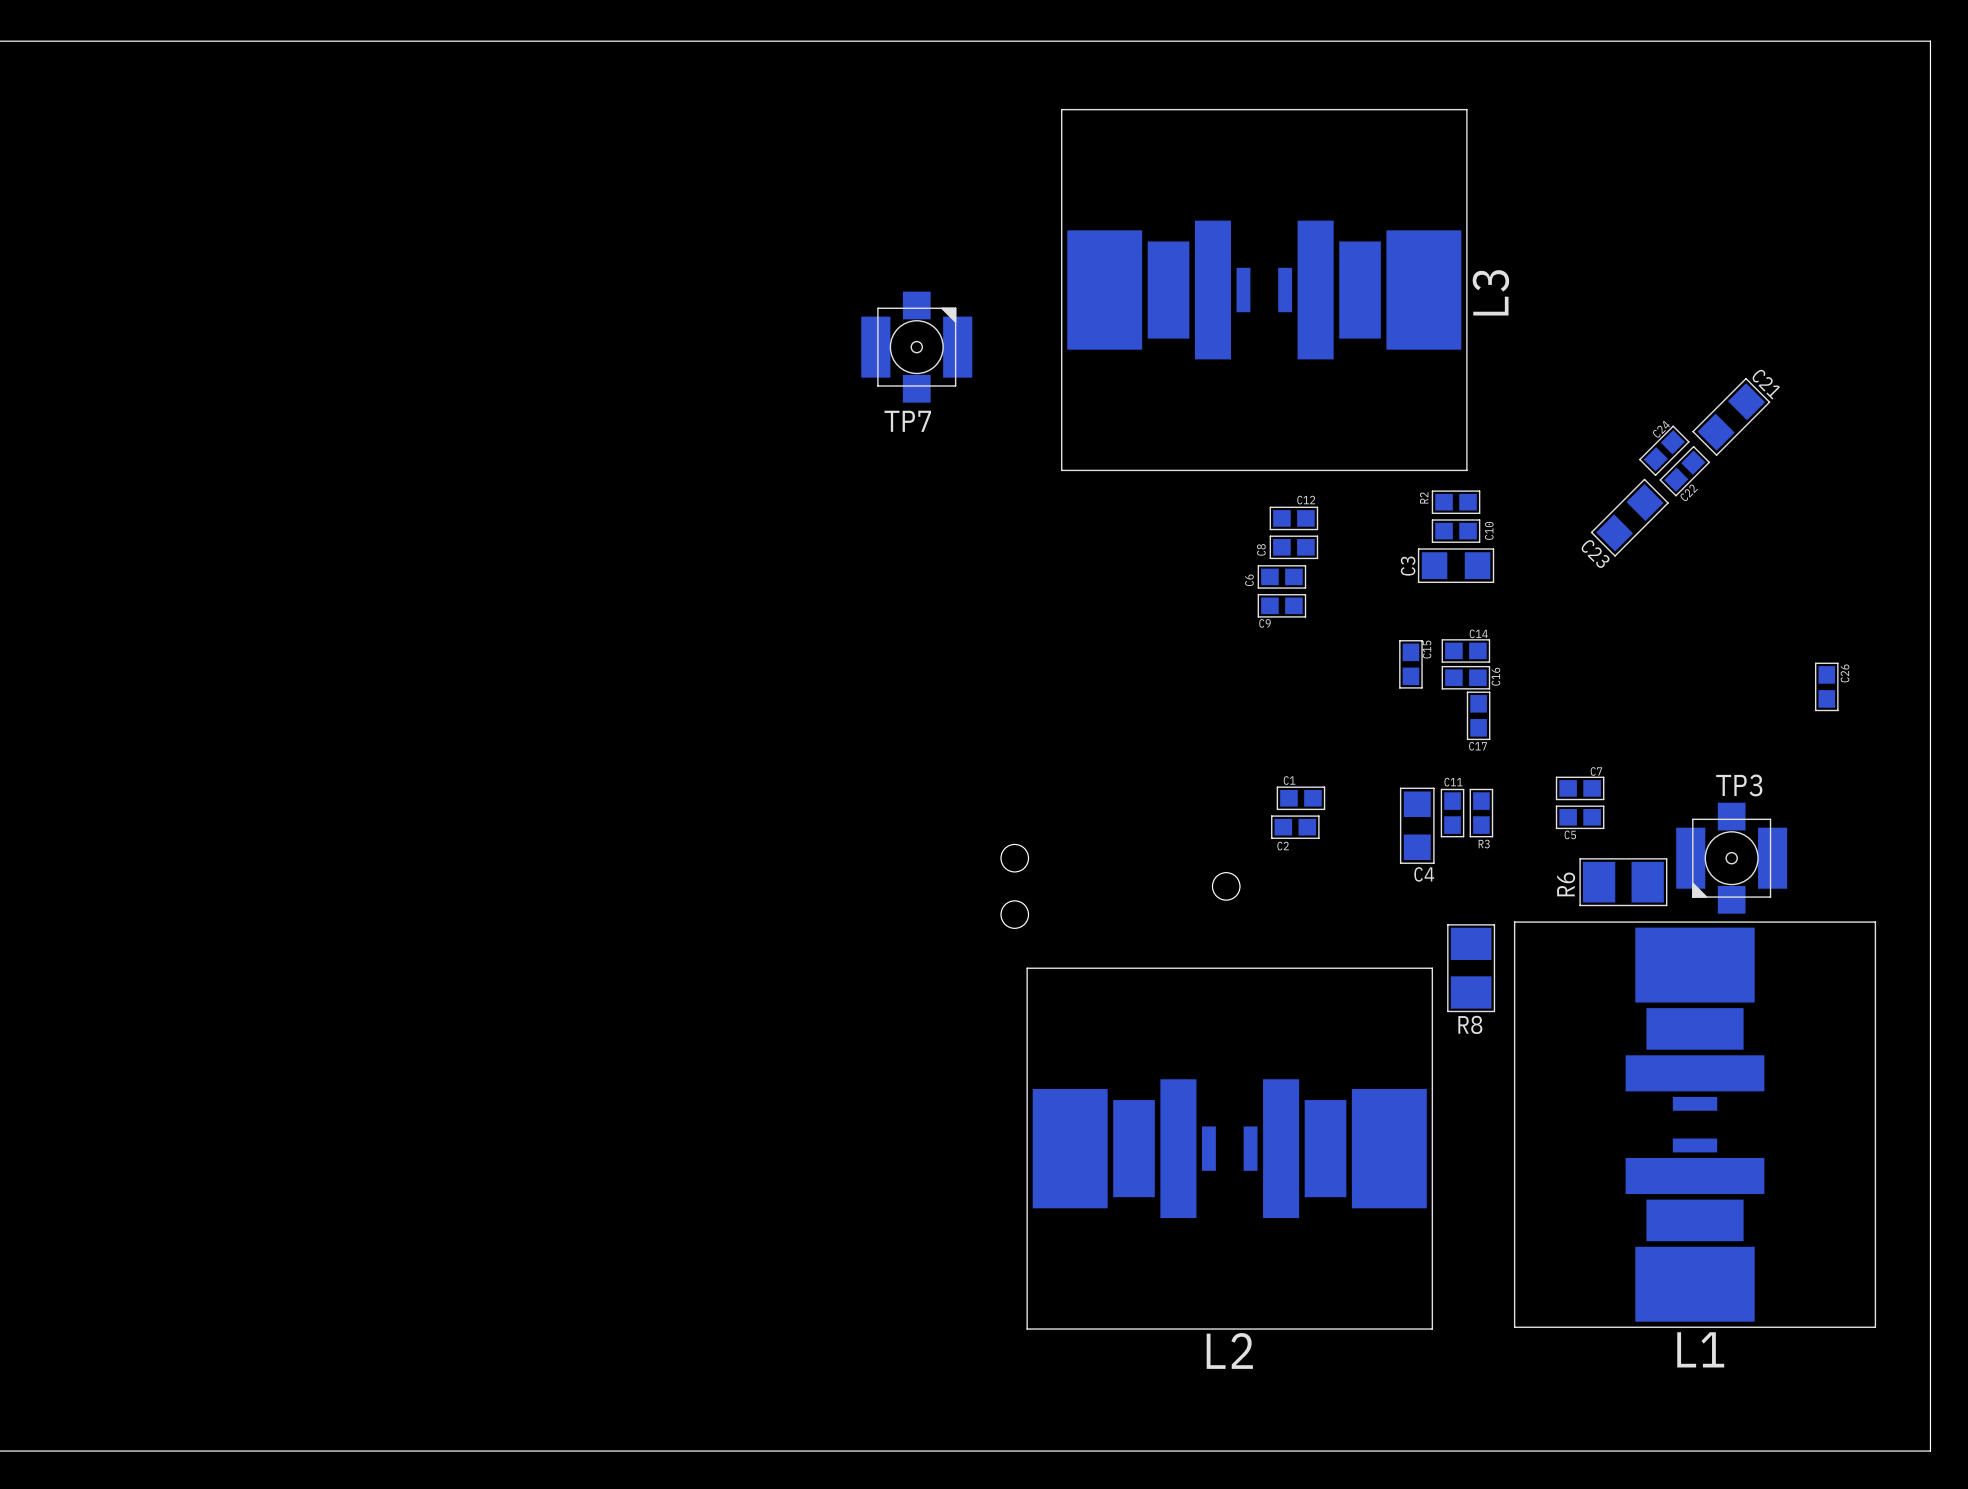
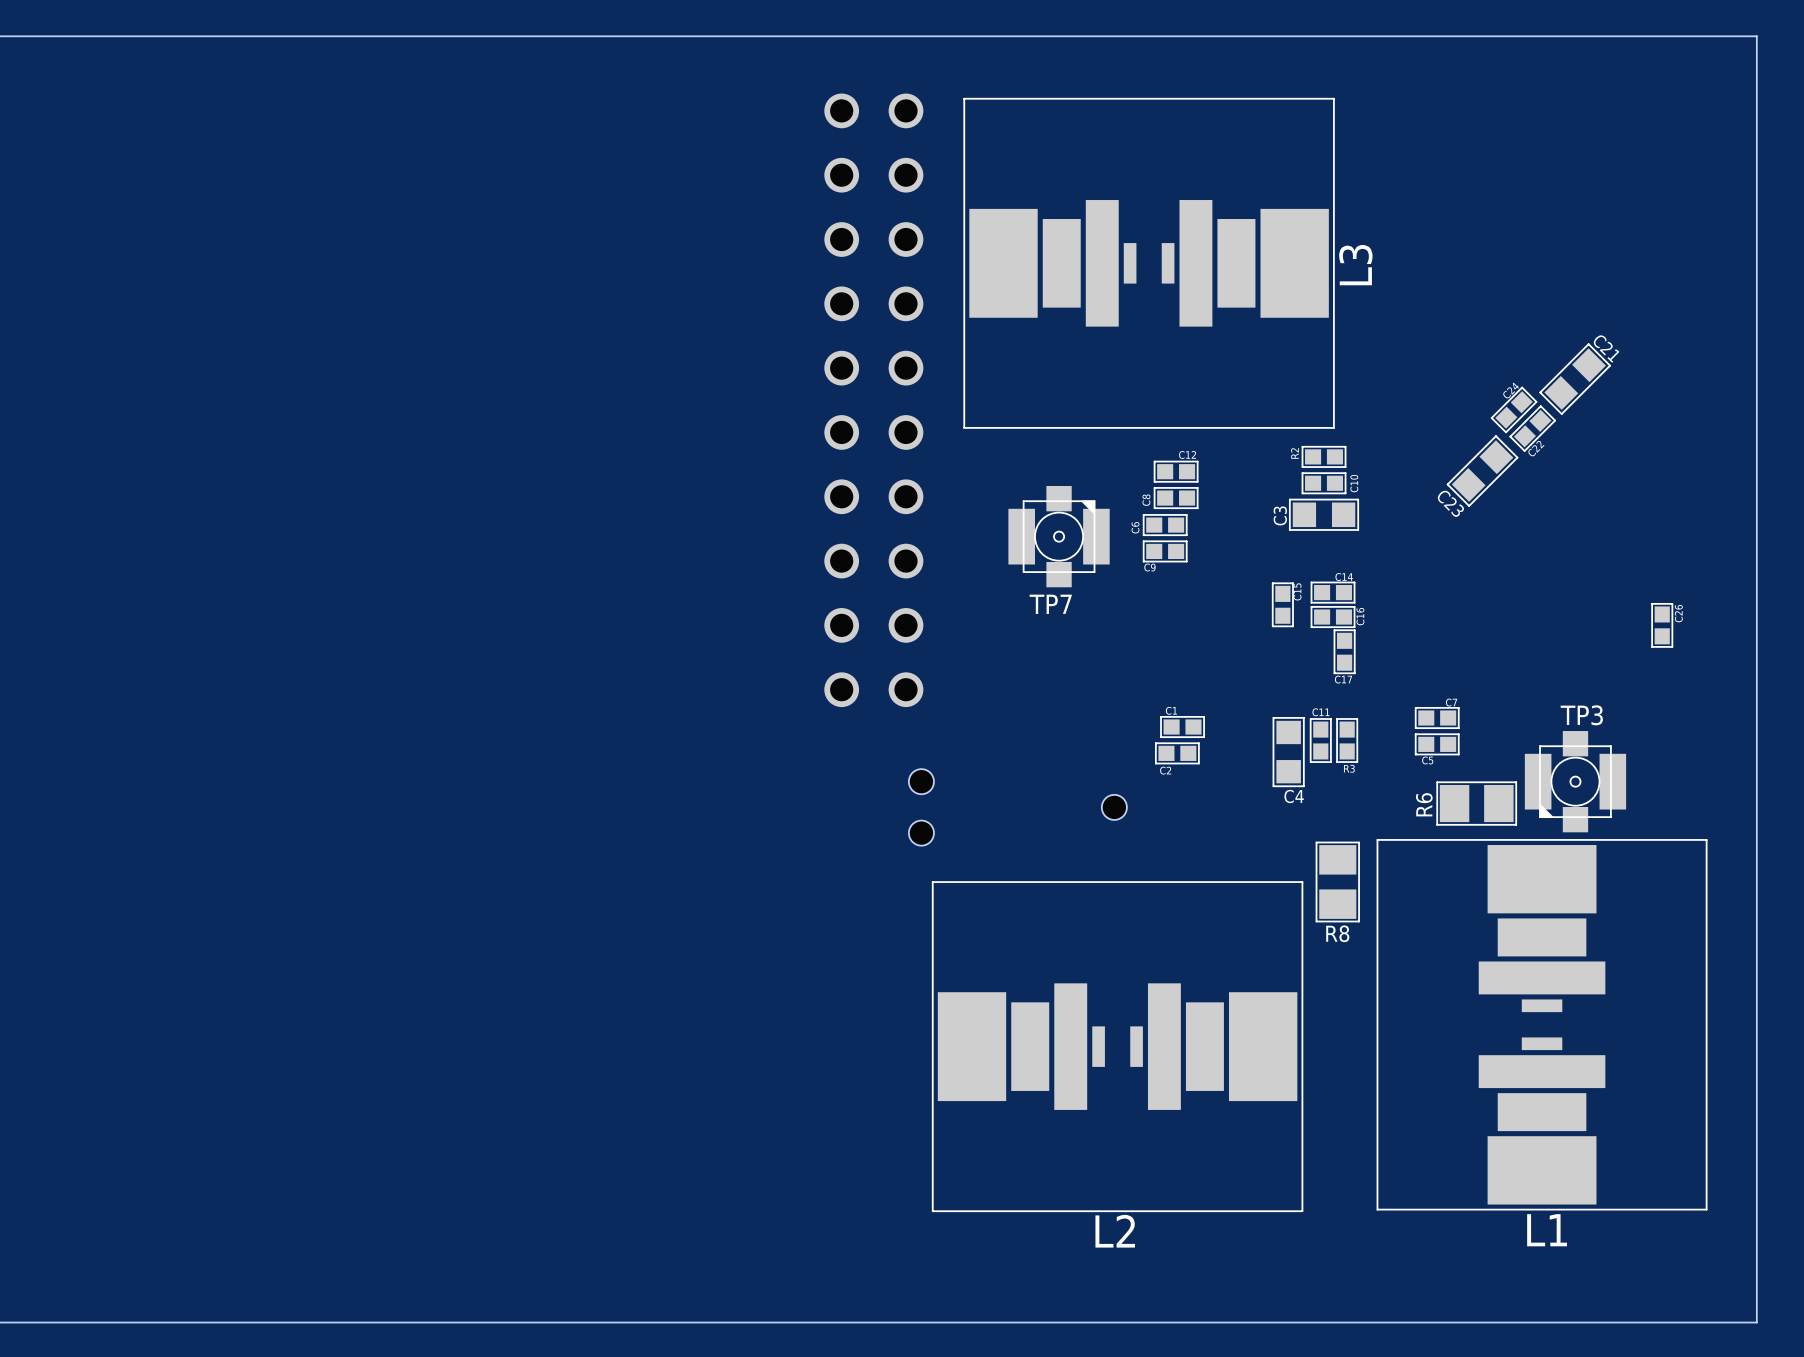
TP7 position: (916, 347) -> (1059, 536)
part: none -> (873, 400)

